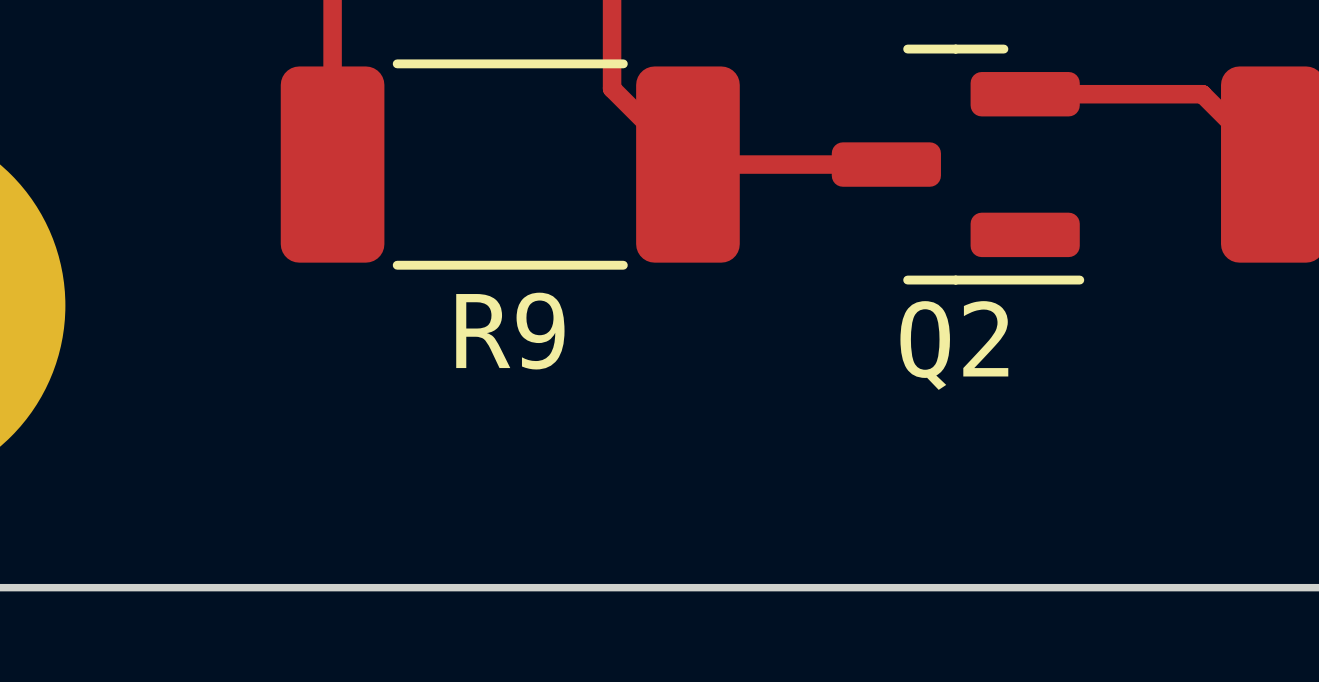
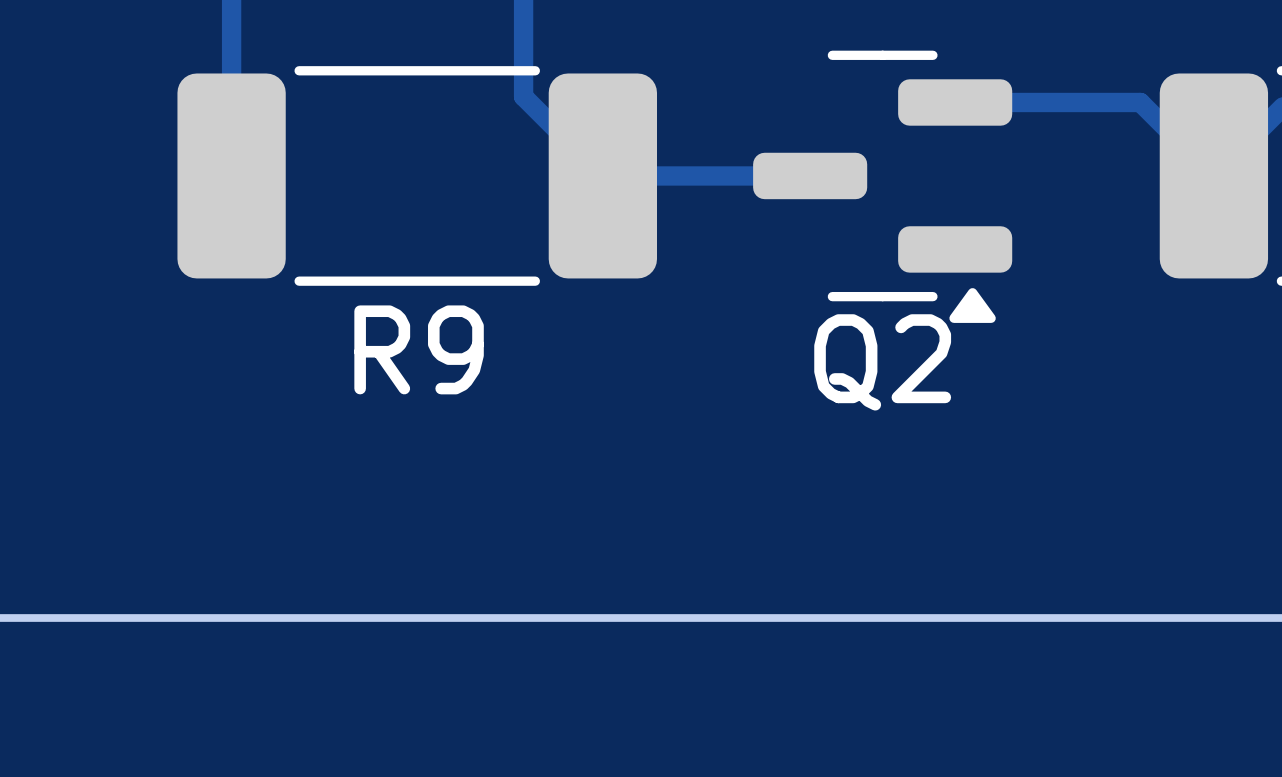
Q2 footprint: [831, 44, 1085, 285] -> [753, 50, 1013, 323]

